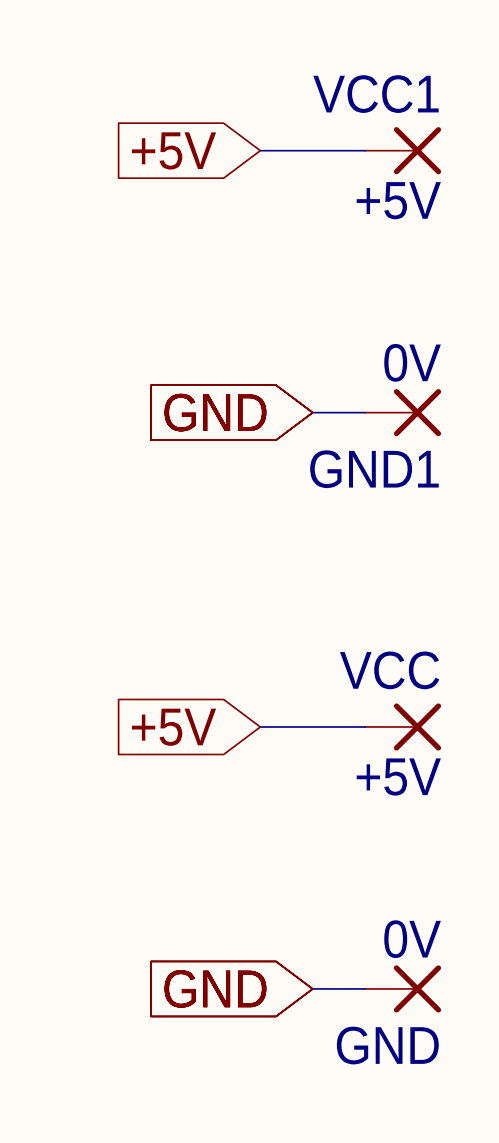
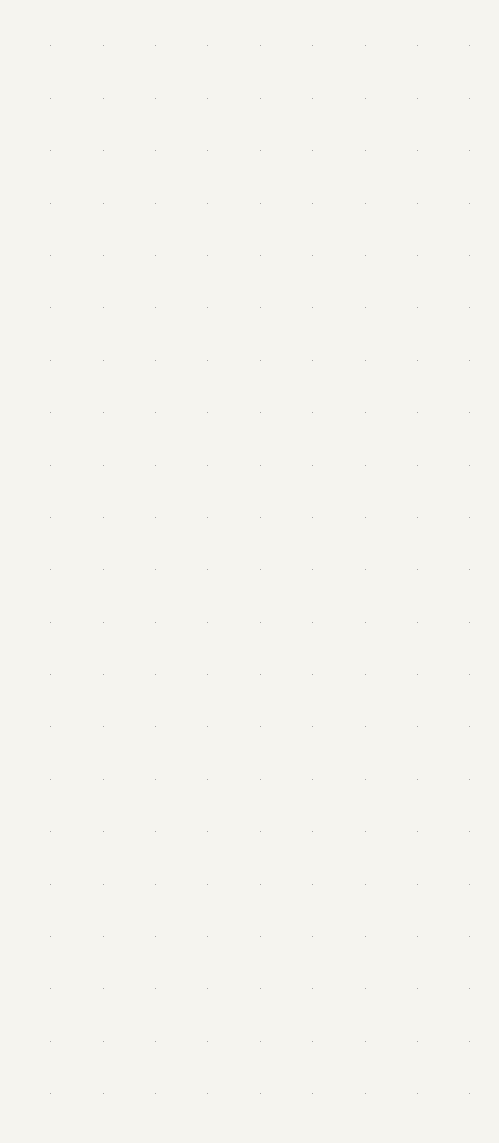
global label: +5V (174, 150) -> none
wire: (260, 150) (365, 150) -> none
VCC1: +5V (403, 150) -> none
global label: GND (215, 412) -> none
wire: (312, 412) (365, 412) -> none
GND1: 0V (403, 412) -> none
wire: (260, 726) (365, 726) -> none
VCC: +5V (403, 726) -> none
global label: +5V (174, 727) -> none
global label: GND (215, 988) -> none
wire: (312, 988) (365, 988) -> none
GND: 0V (403, 988) -> none

